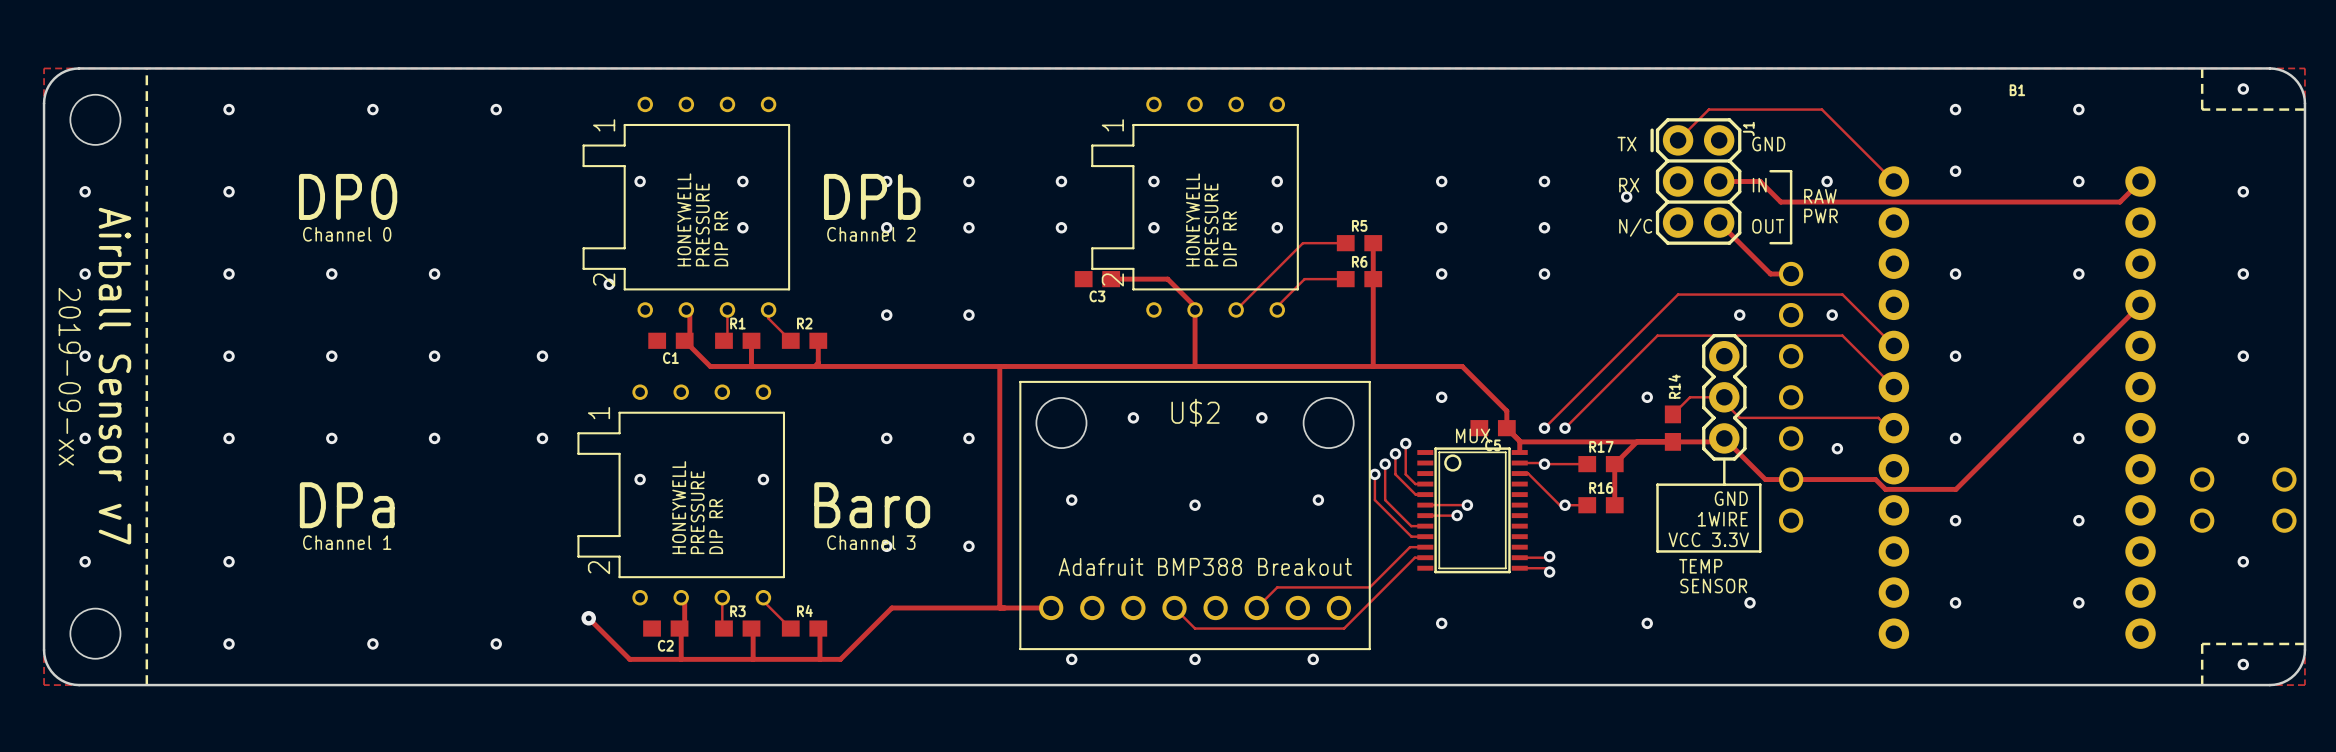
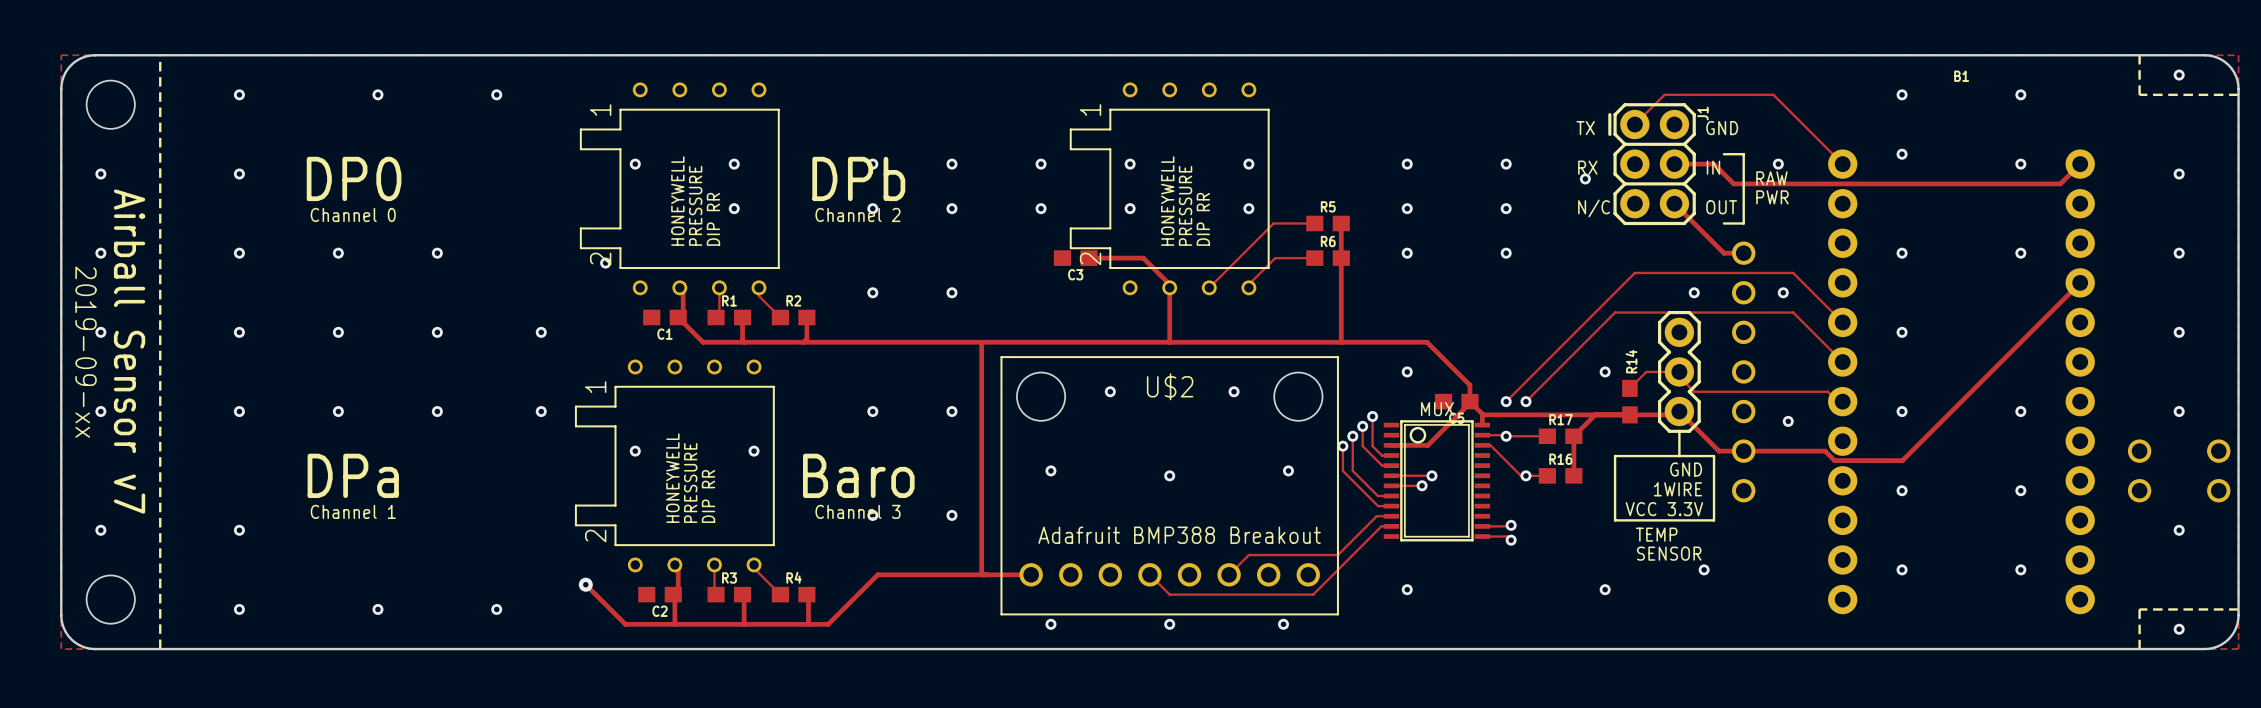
track: none -> (1470, 402) (1427, 445) (1391, 445)

